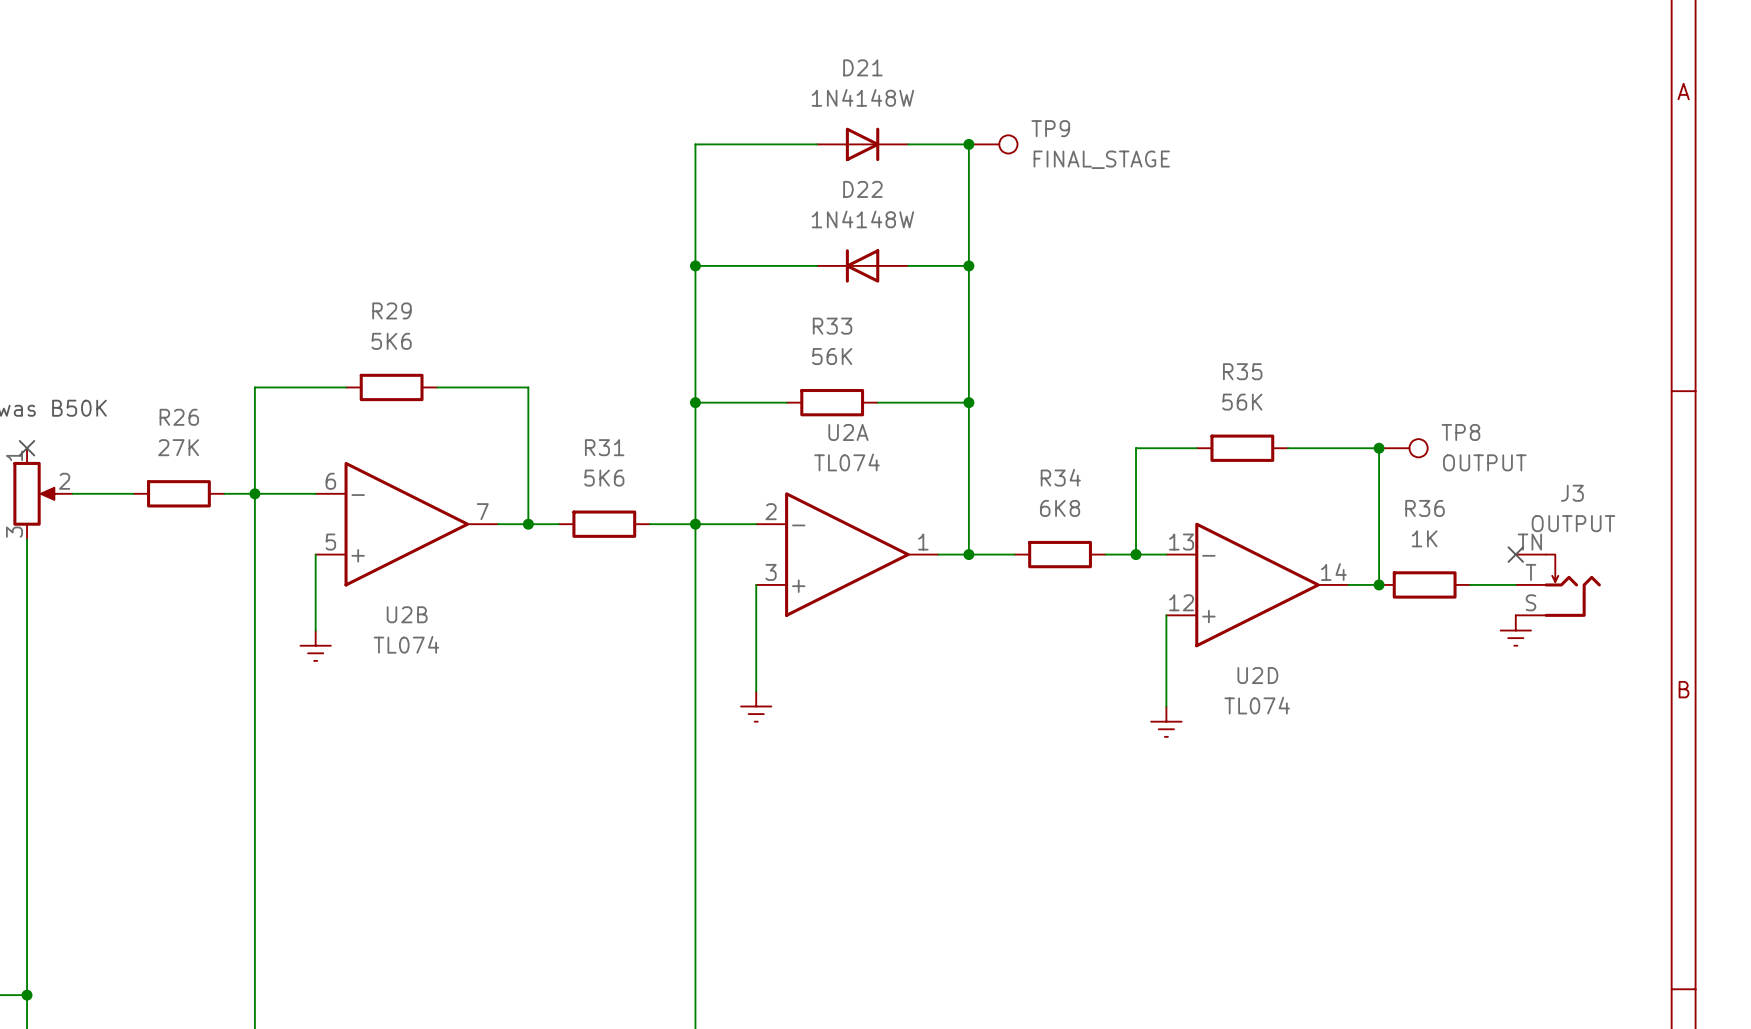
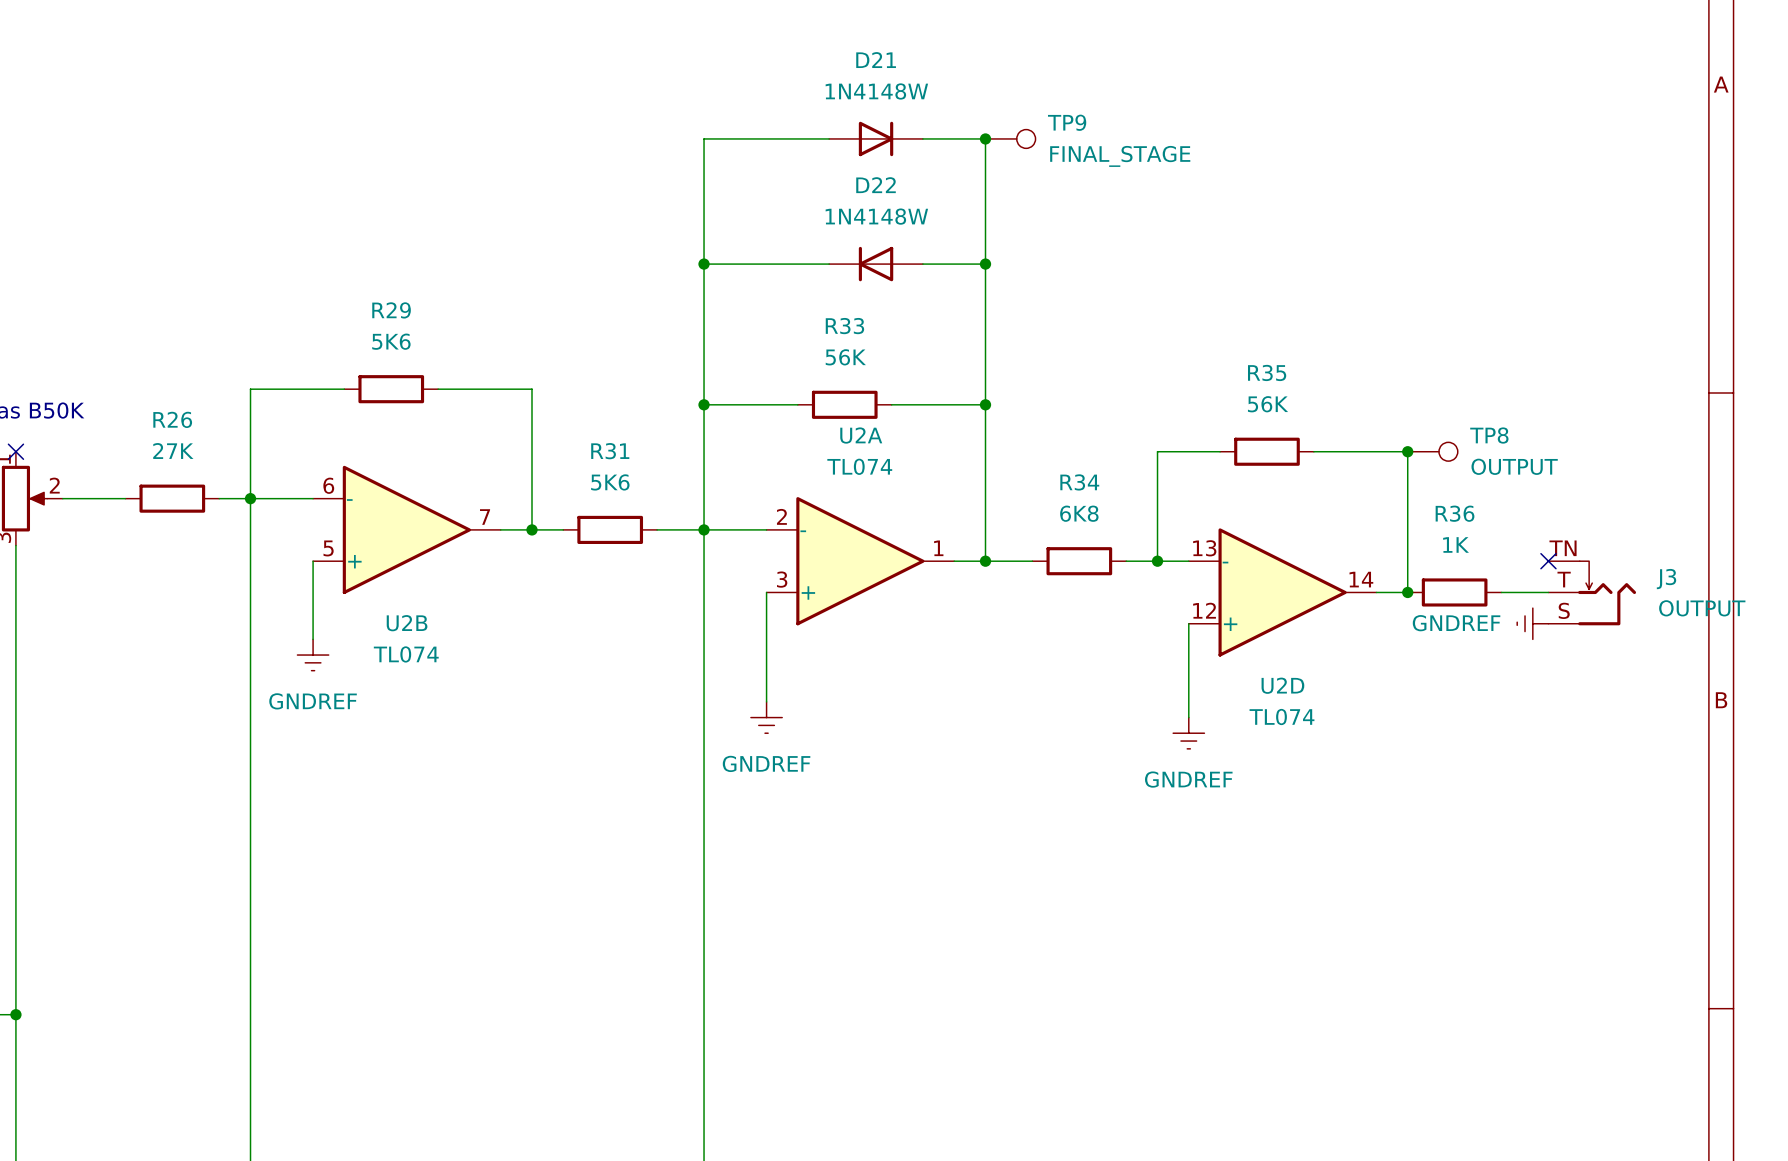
J3 name position: J3 (1572, 493) -> J3 (1666, 579)
J3 value position: OUTPUT (1573, 523) -> OUTPUT (1702, 608)
power symbol: none -> GNDREF (1532, 623)
power symbol: (1515, 630) -> none
power symbol text: none -> GNDREF (313, 701)
power symbol text: none -> GNDREF (766, 763)
power symbol text: none -> GNDREF (1188, 779)

